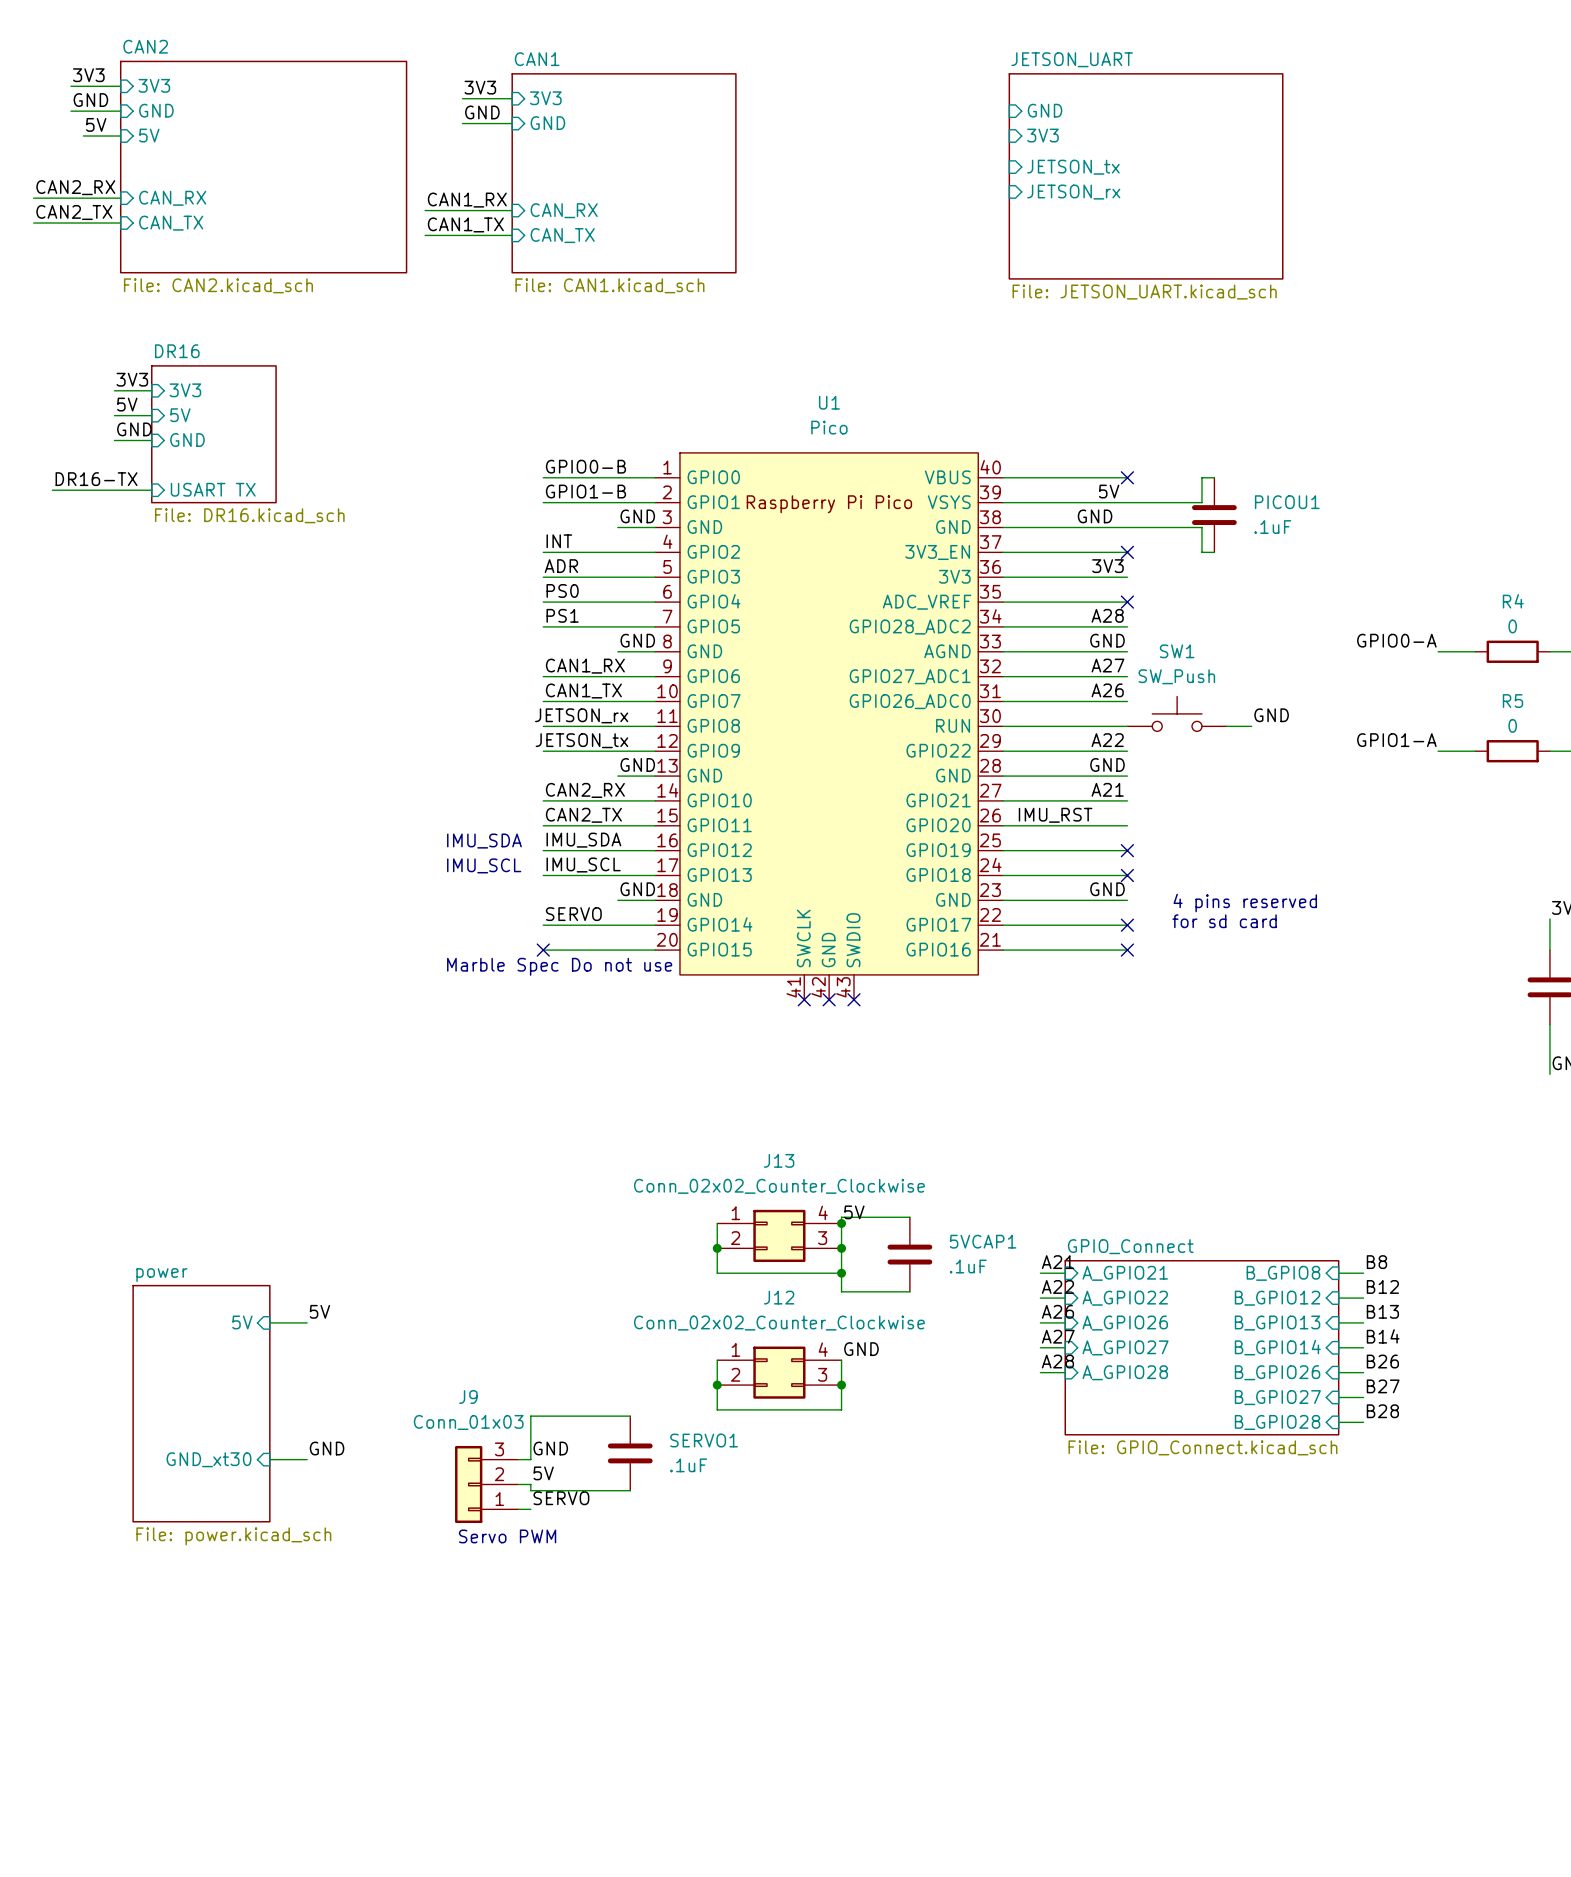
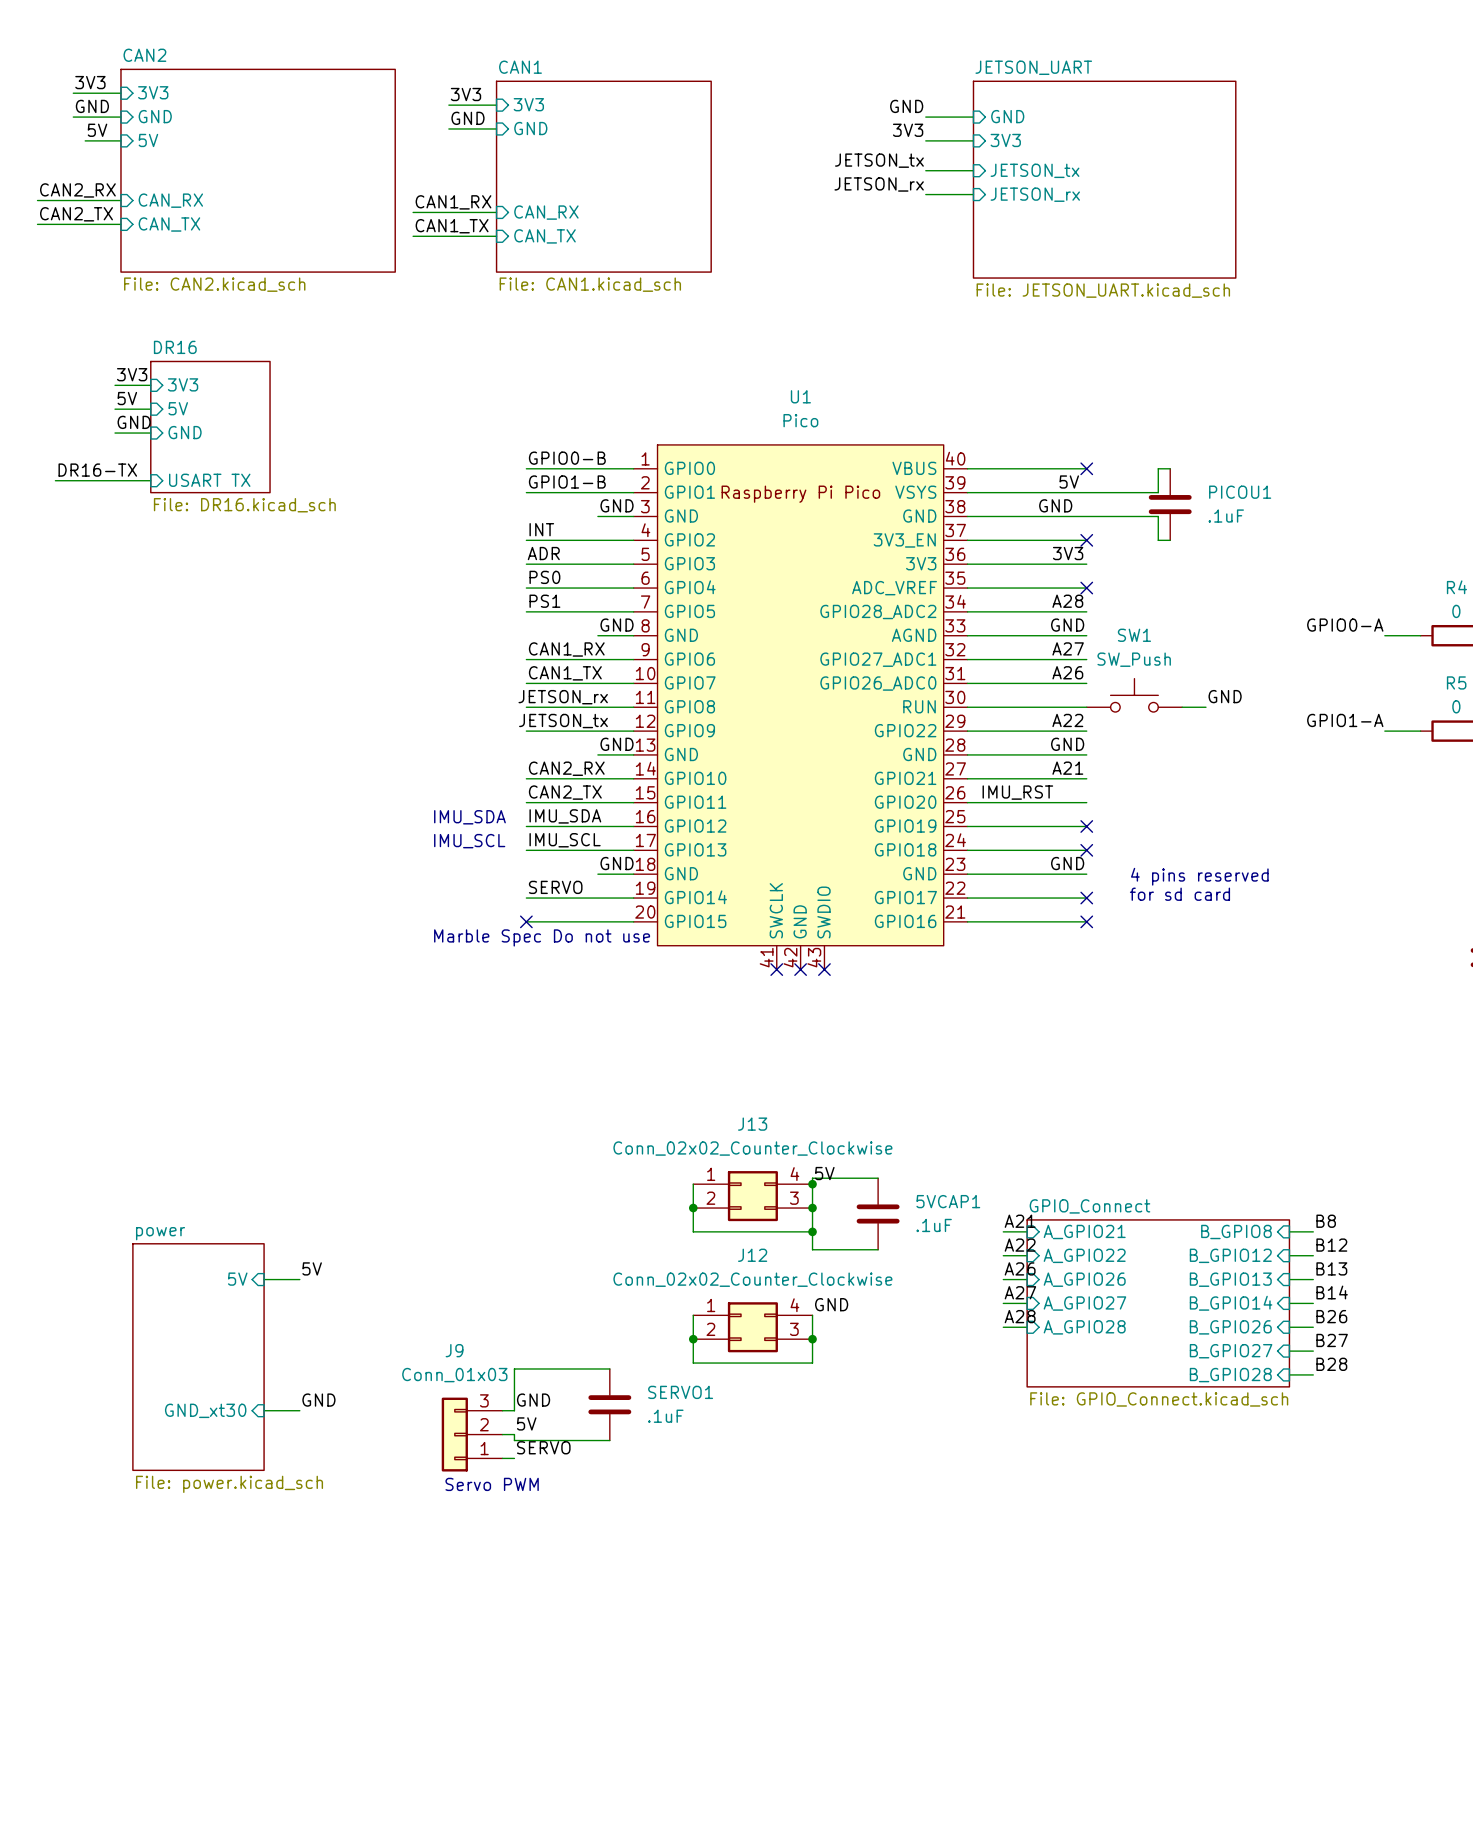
label: none -> GND (906, 106)
wire: none -> (925, 117) (973, 117)
label: none -> 3V3 (908, 130)
wire: none -> (925, 140) (973, 140)
label: none -> JETSON_tx (879, 160)
wire: none -> (925, 170) (973, 170)
label: none -> JETSON_rx (879, 184)
wire: none -> (925, 194) (973, 194)

